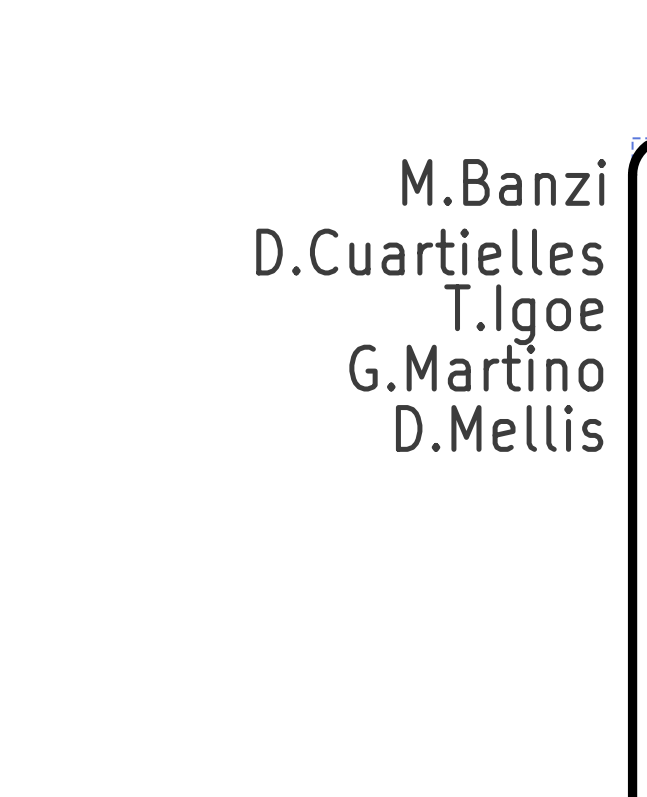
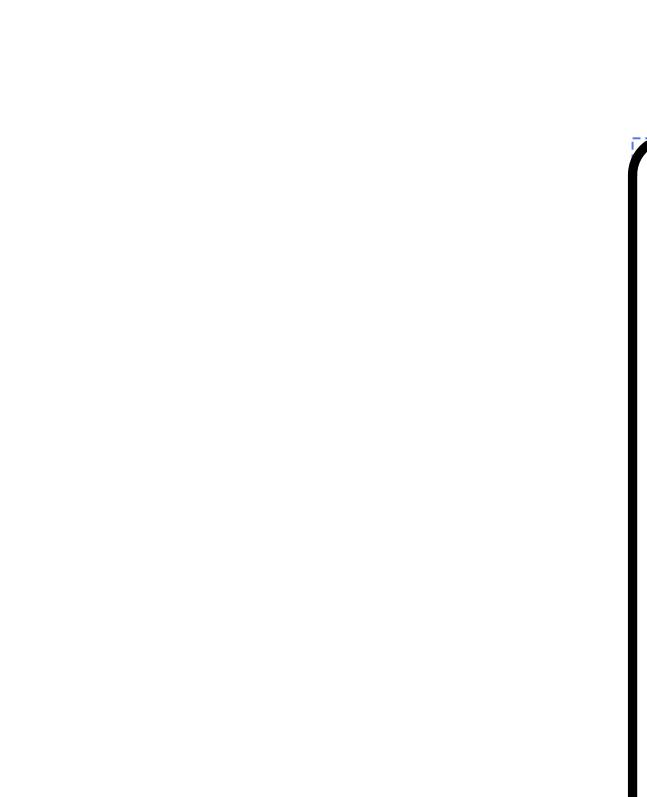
text: M.Banzi (504, 182) -> none
text: D.Cuartielles (429, 252) -> none
text: T.Igoe (523, 314) -> none
text: G.Martino (476, 368) -> none
text: D.Mellis (499, 428) -> none

